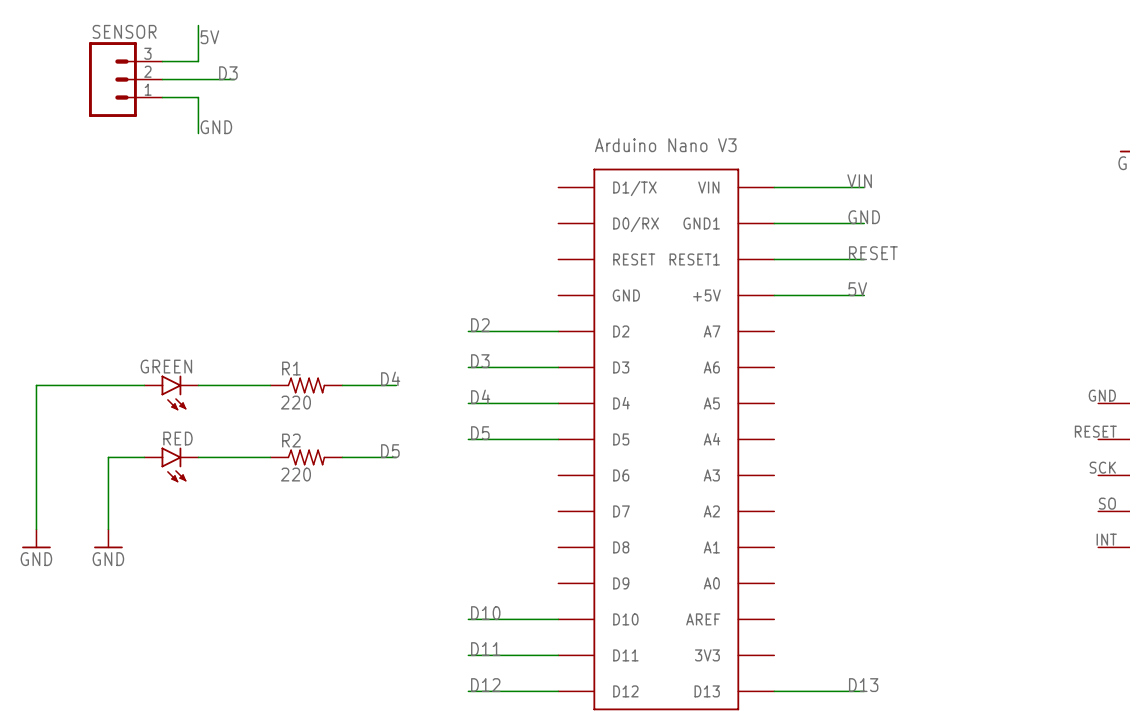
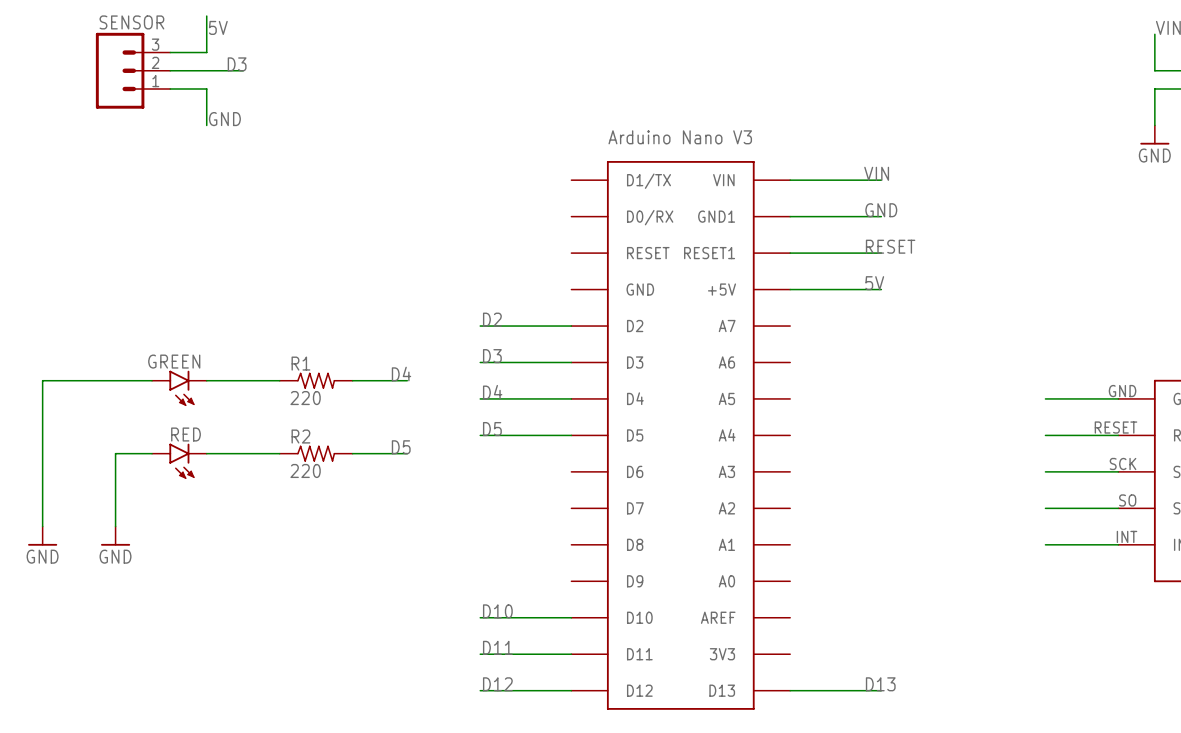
wire: none -> (1045, 398) (1118, 398)
wire: none -> (1045, 435) (1118, 435)
wire: none -> (1045, 471) (1118, 471)
wire: none -> (1045, 508) (1118, 508)
wire: none -> (1045, 544) (1118, 544)

